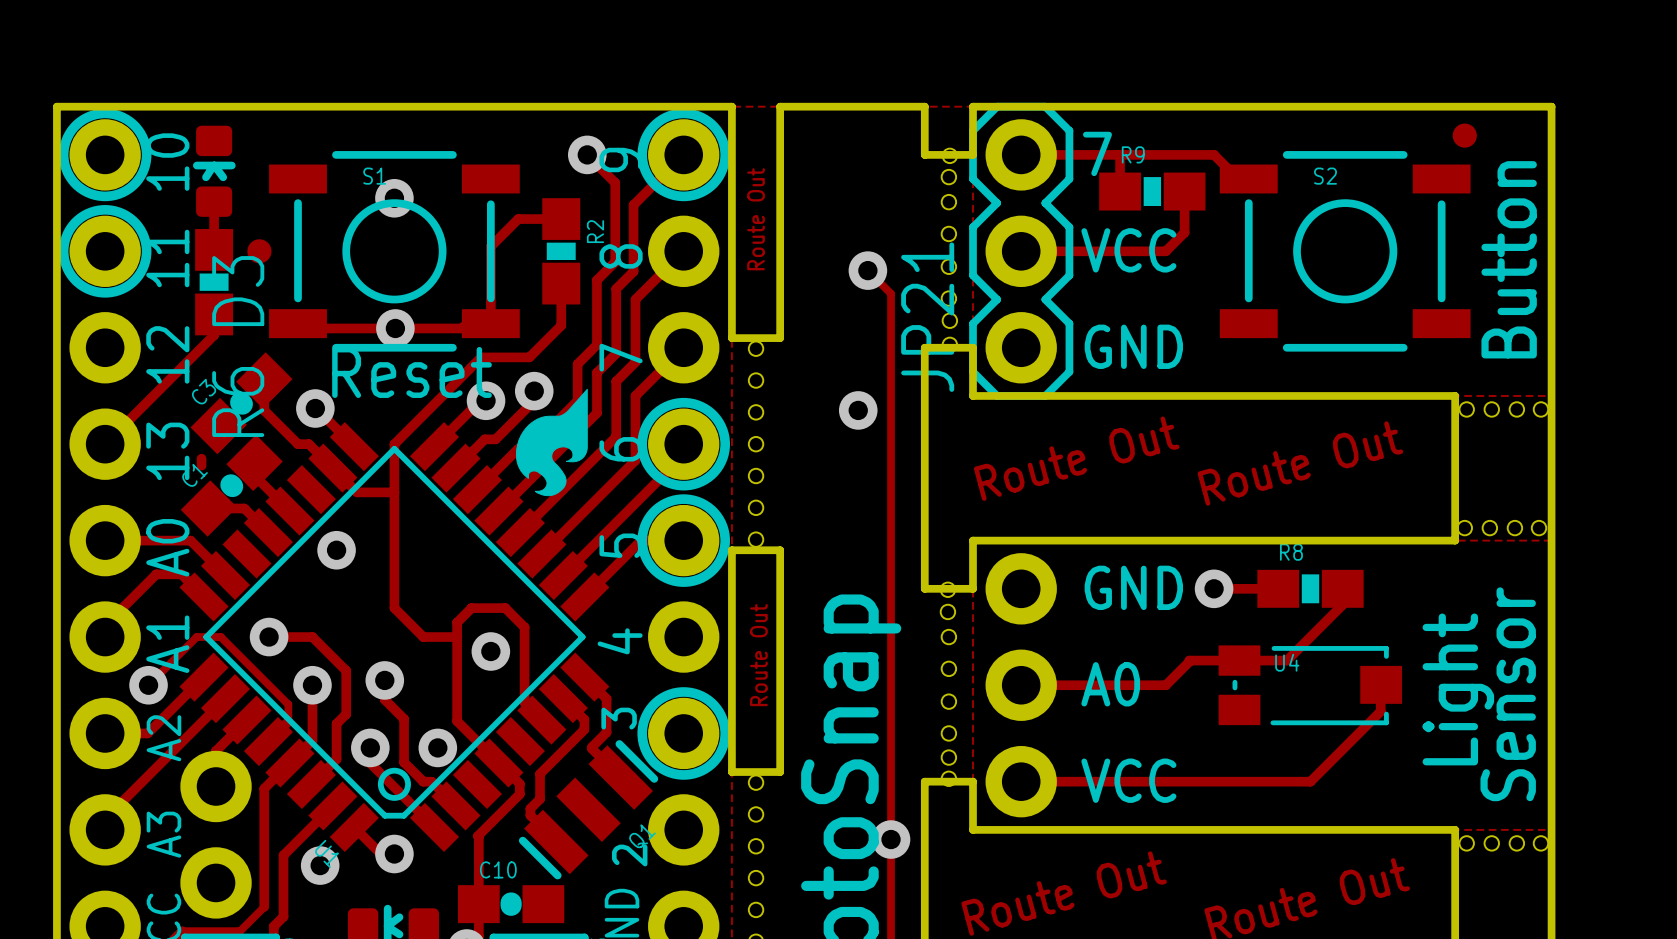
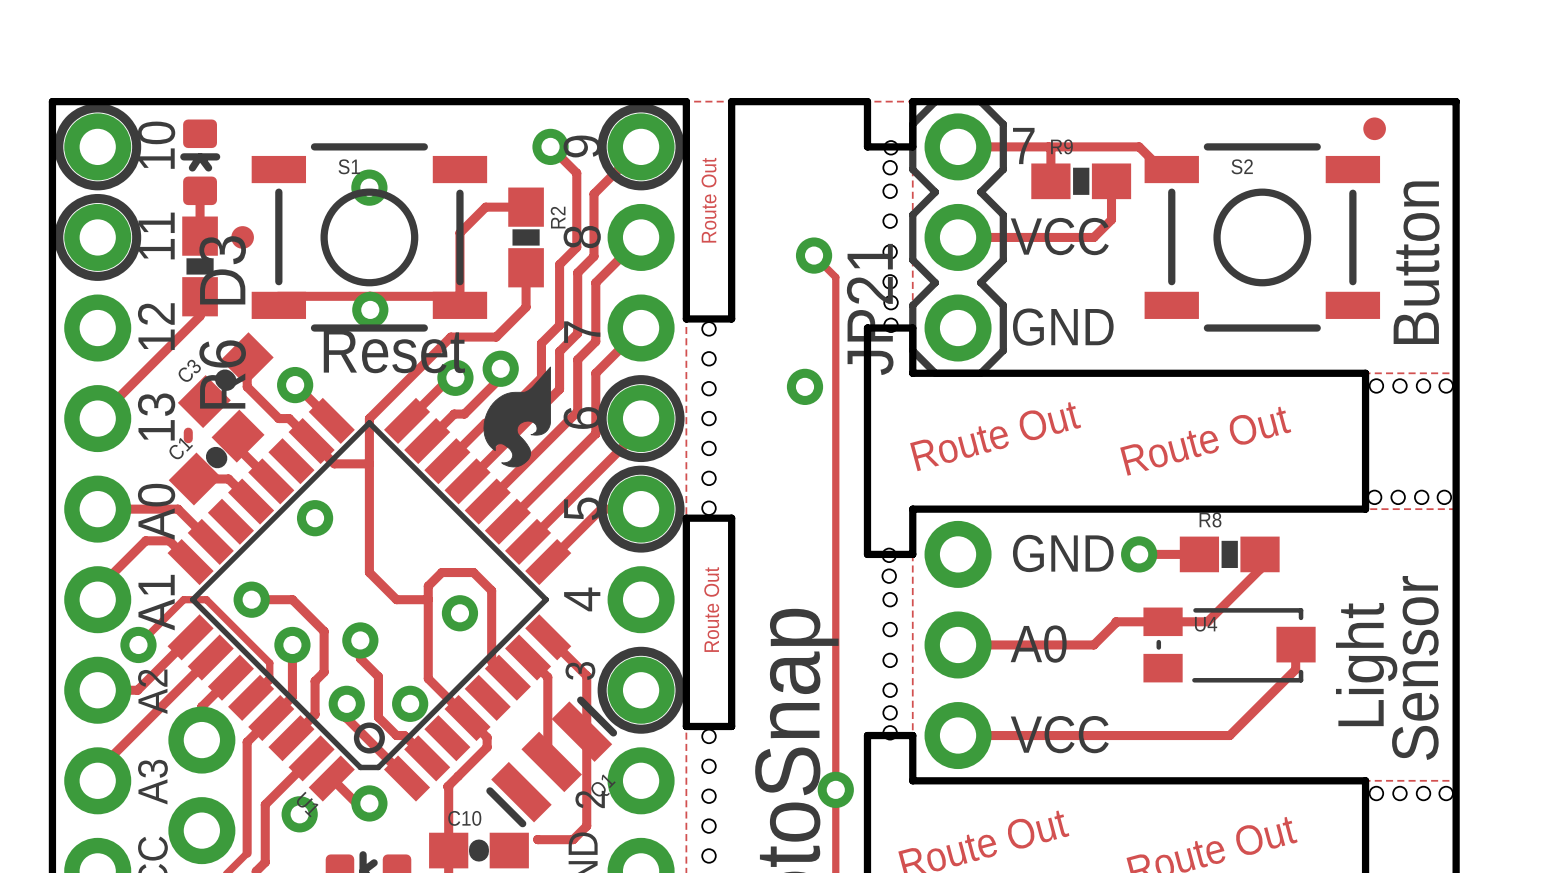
track: (490, 313) (490, 323) (466, 323) (461, 328) (302, 328) (298, 323) -> (459, 295) (277, 296)
track: (606, 698) (606, 732) (592, 748) (620, 777) -> (568, 657) (586, 675) (586, 826) (573, 839) (537, 839)
track: (584, 729) (540, 773) (540, 799) (530, 808) (530, 815) (556, 841) -> (547, 686) (547, 750) (537, 753)

